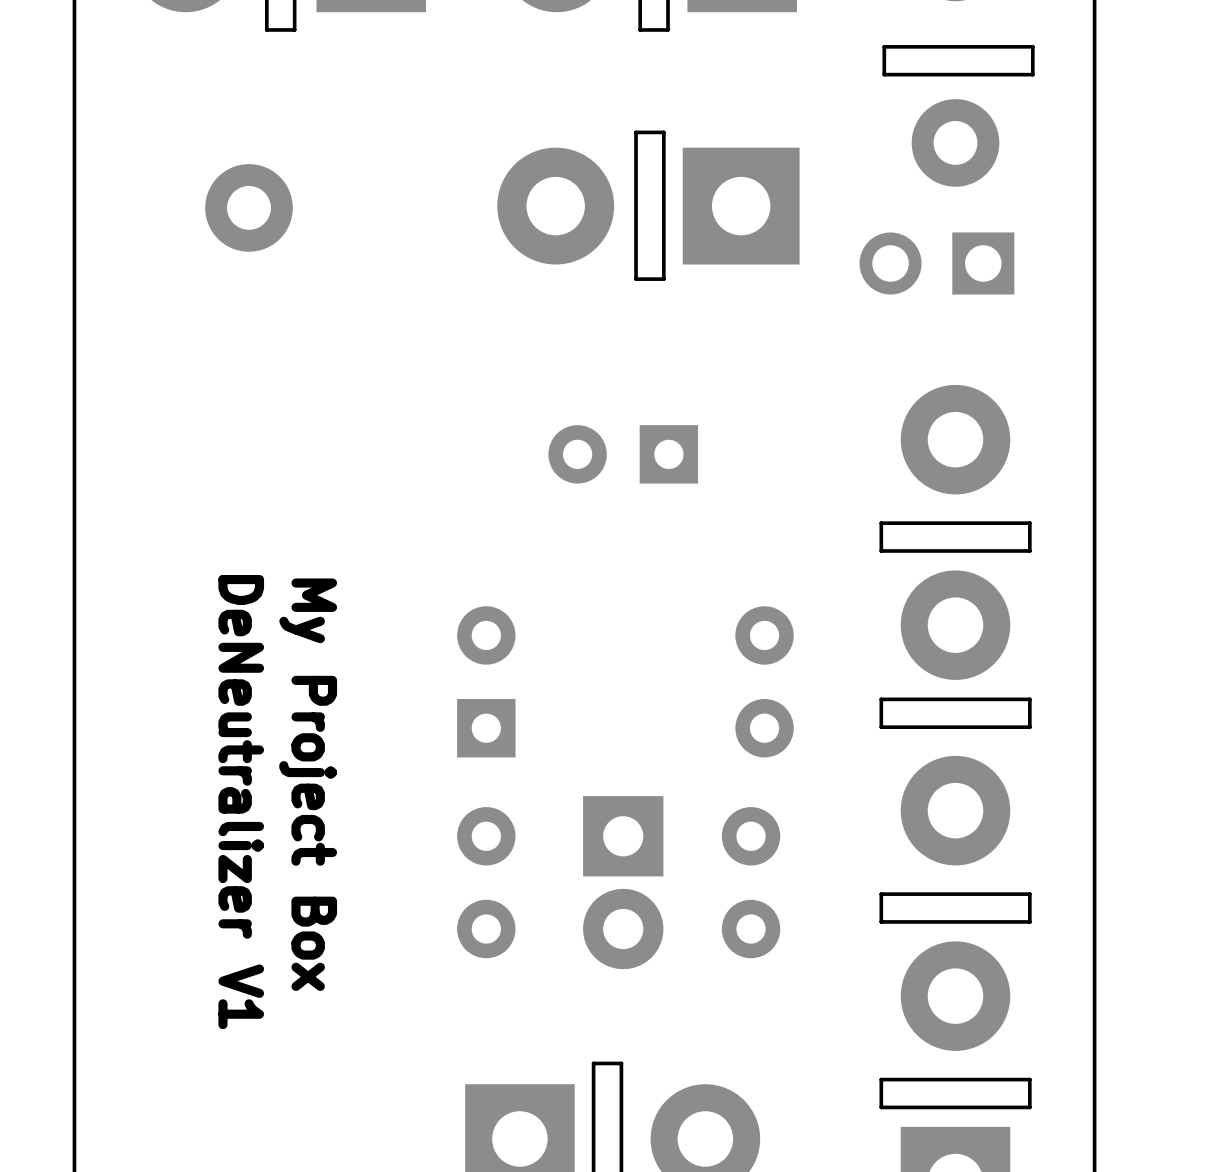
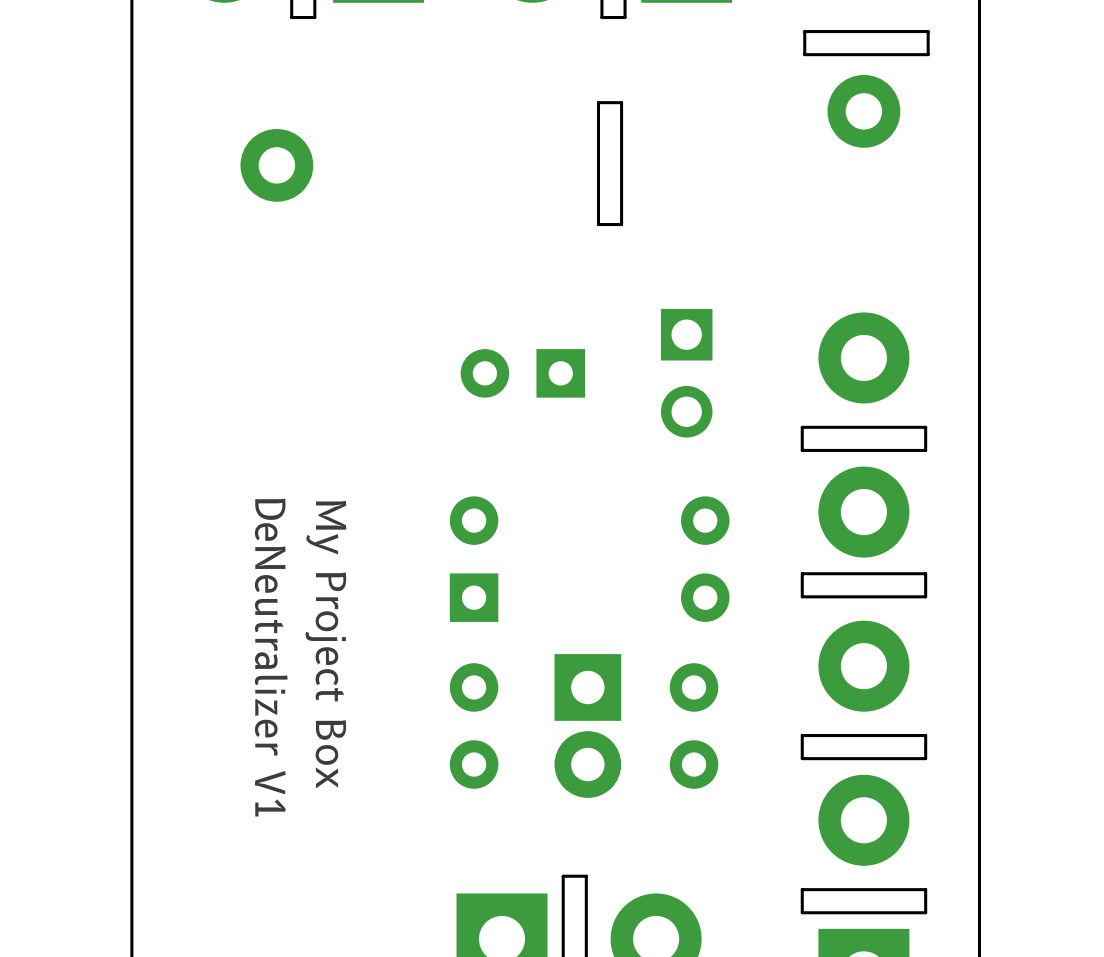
part: (648, 206) -> none
part rotation: 0° (936, 263) -> 90° counterclockwise (686, 373)
part position: (936, 263) -> (686, 373)
part position: (623, 454) -> (522, 373)

